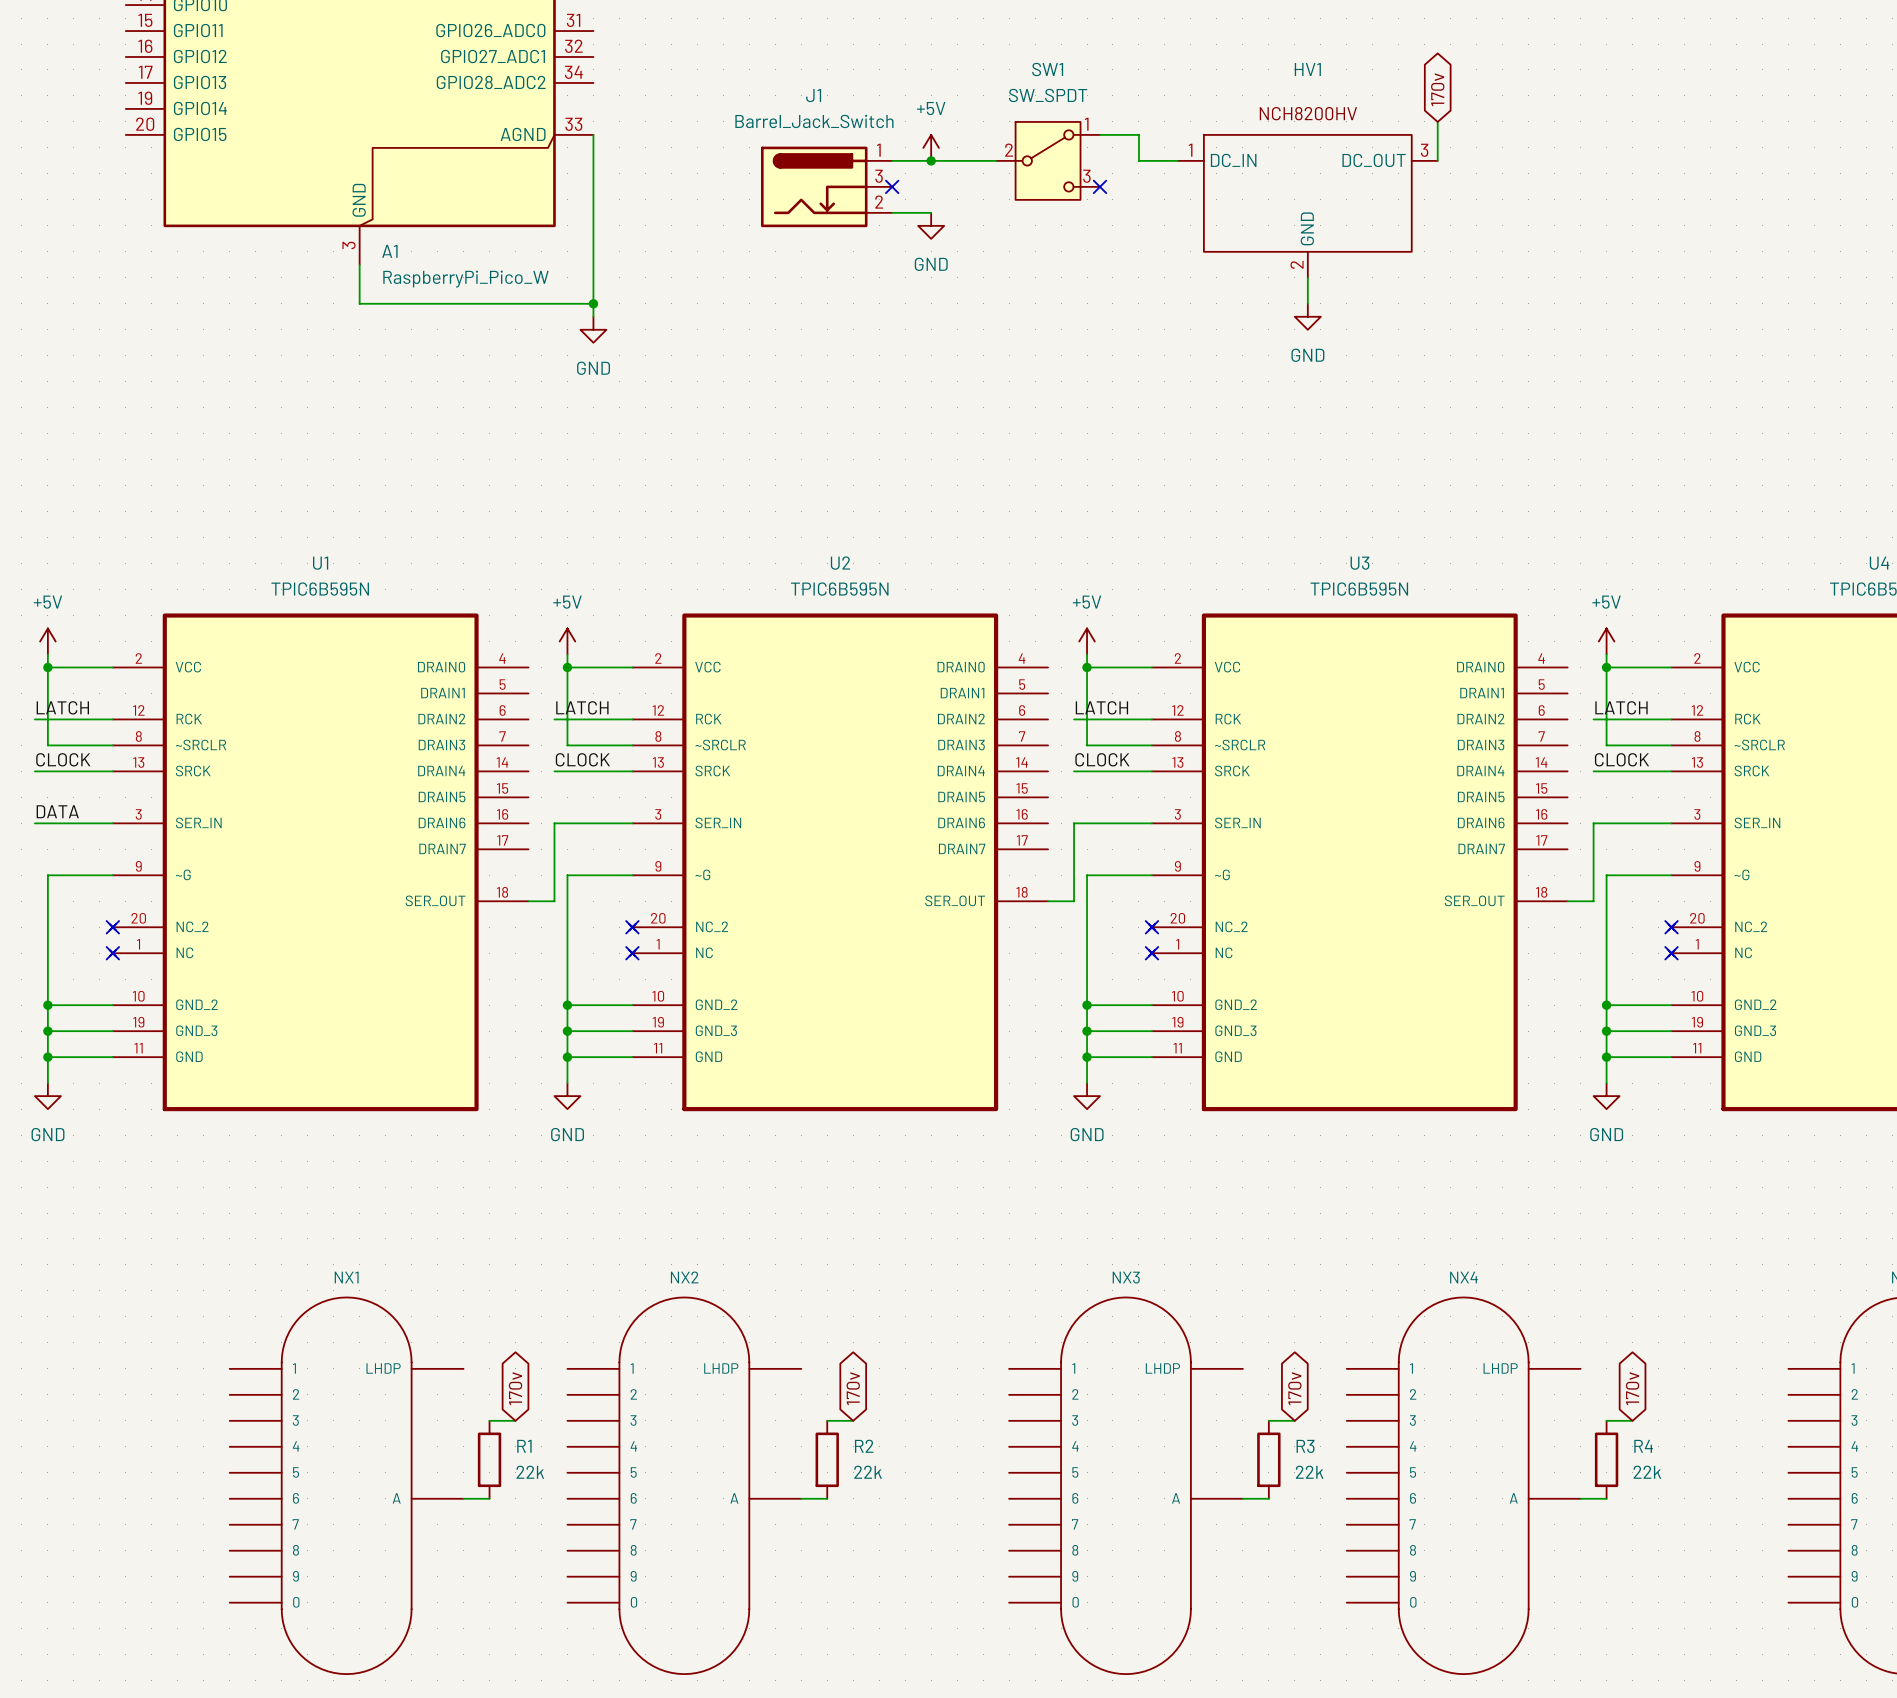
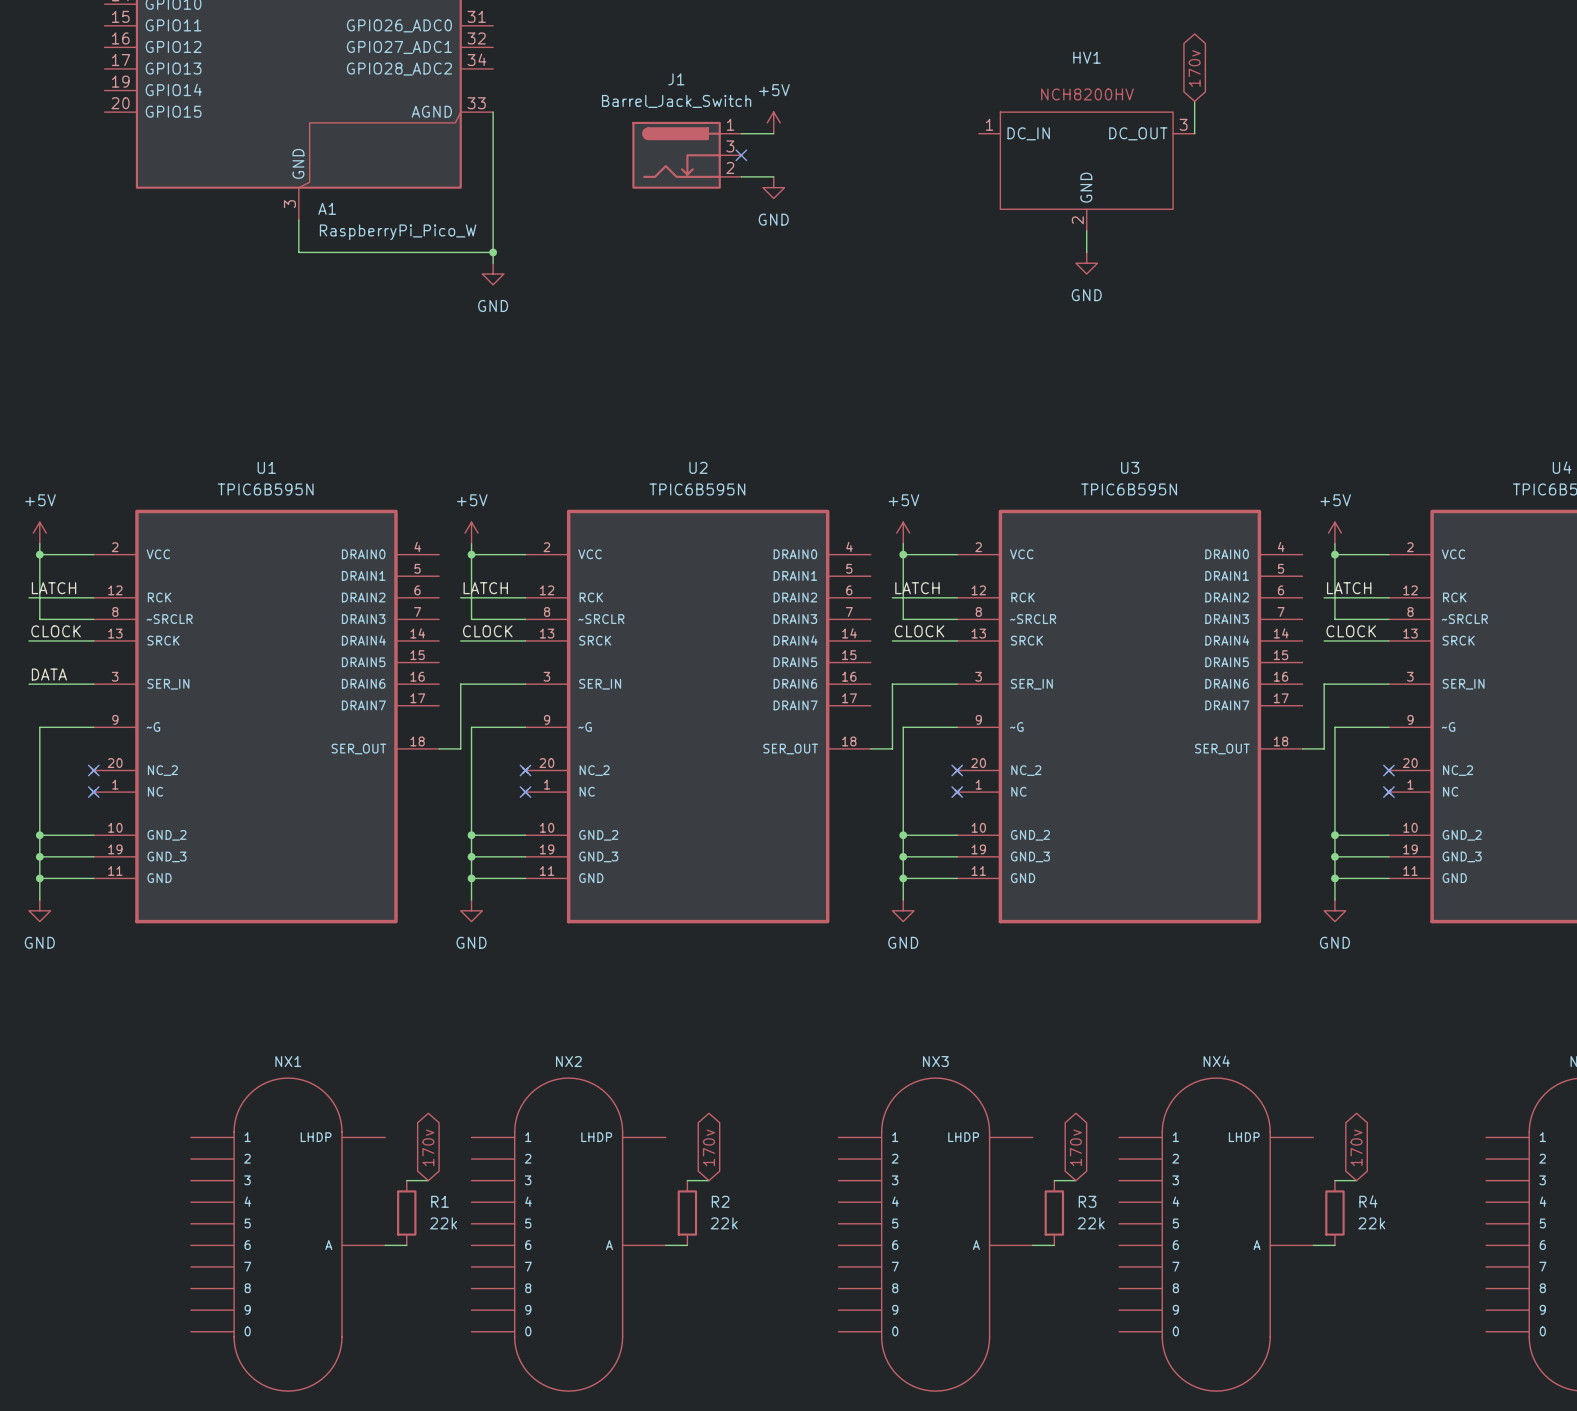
wire: (1100, 134) (1138, 134) (1138, 160) (1177, 160) -> none
wire: (931, 160) (996, 160) -> none
junction: (931, 160) -> none
SW1: SW_SPDT (1048, 160) -> none
no-connect mark: (1100, 186) -> none

